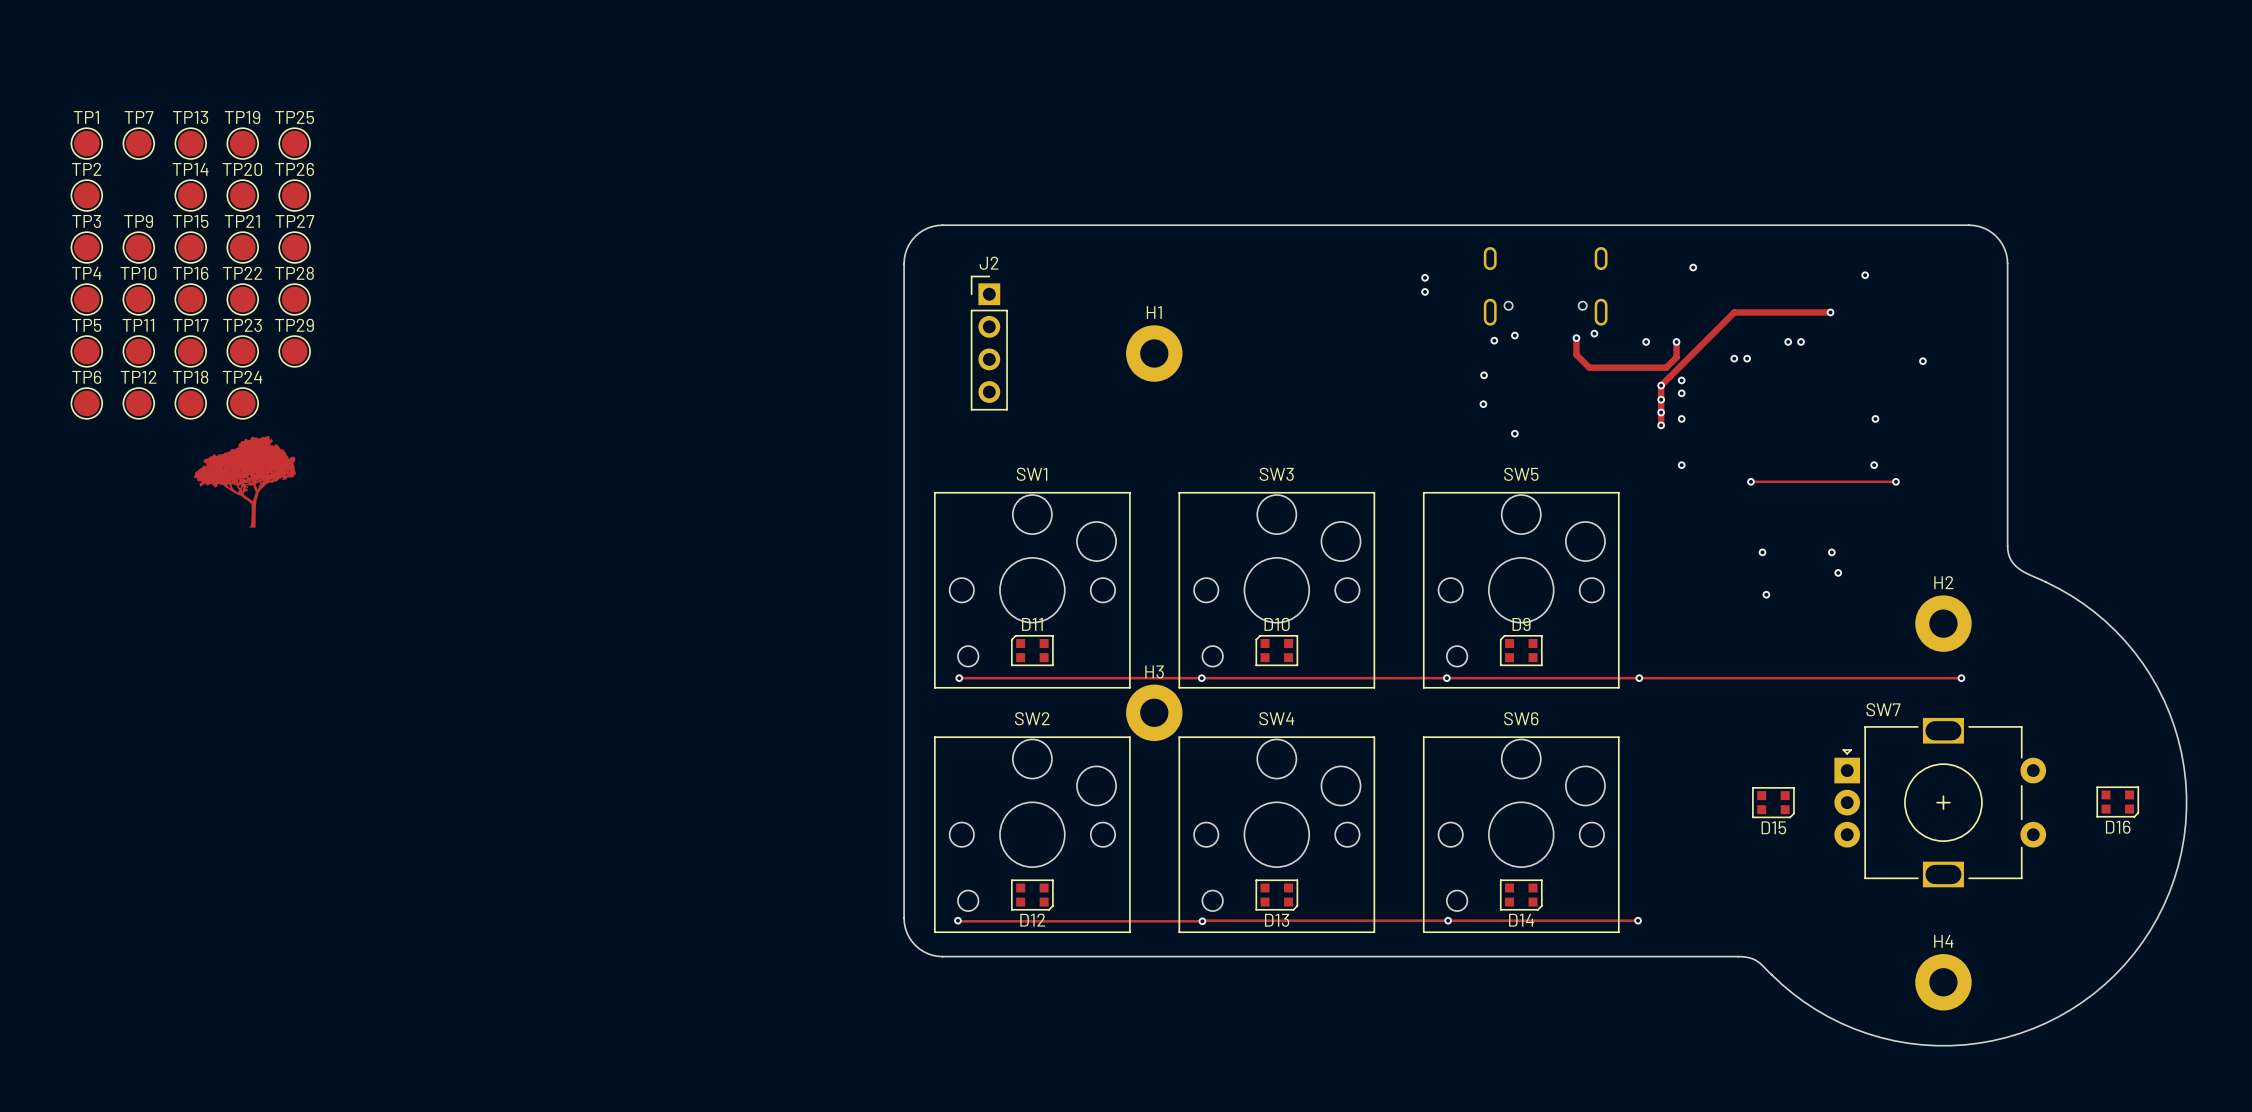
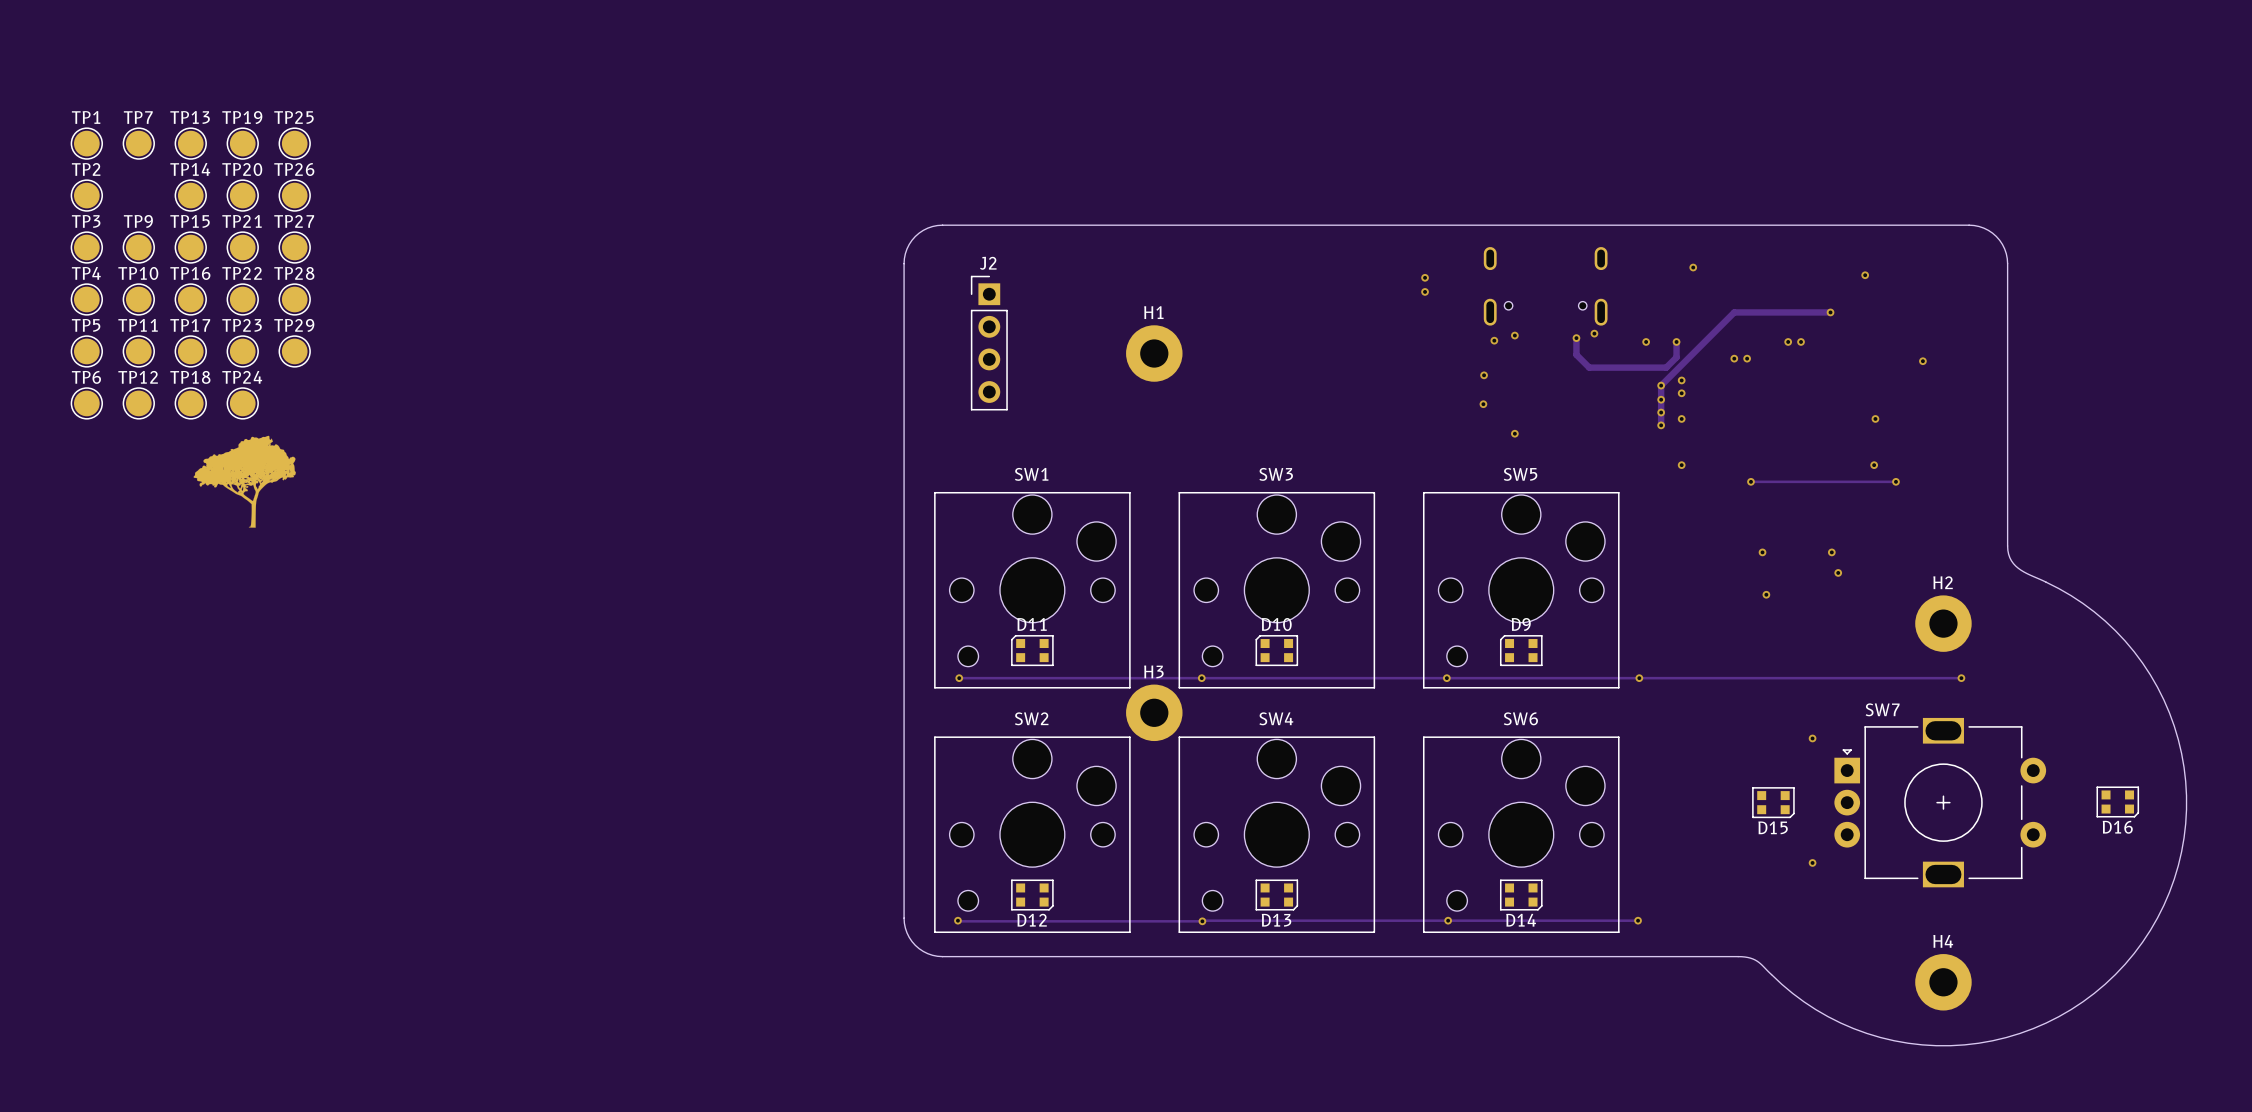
via: none -> (1812, 738)
via: none -> (1812, 862)

